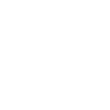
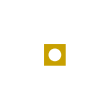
part: none -> (54, 54)

